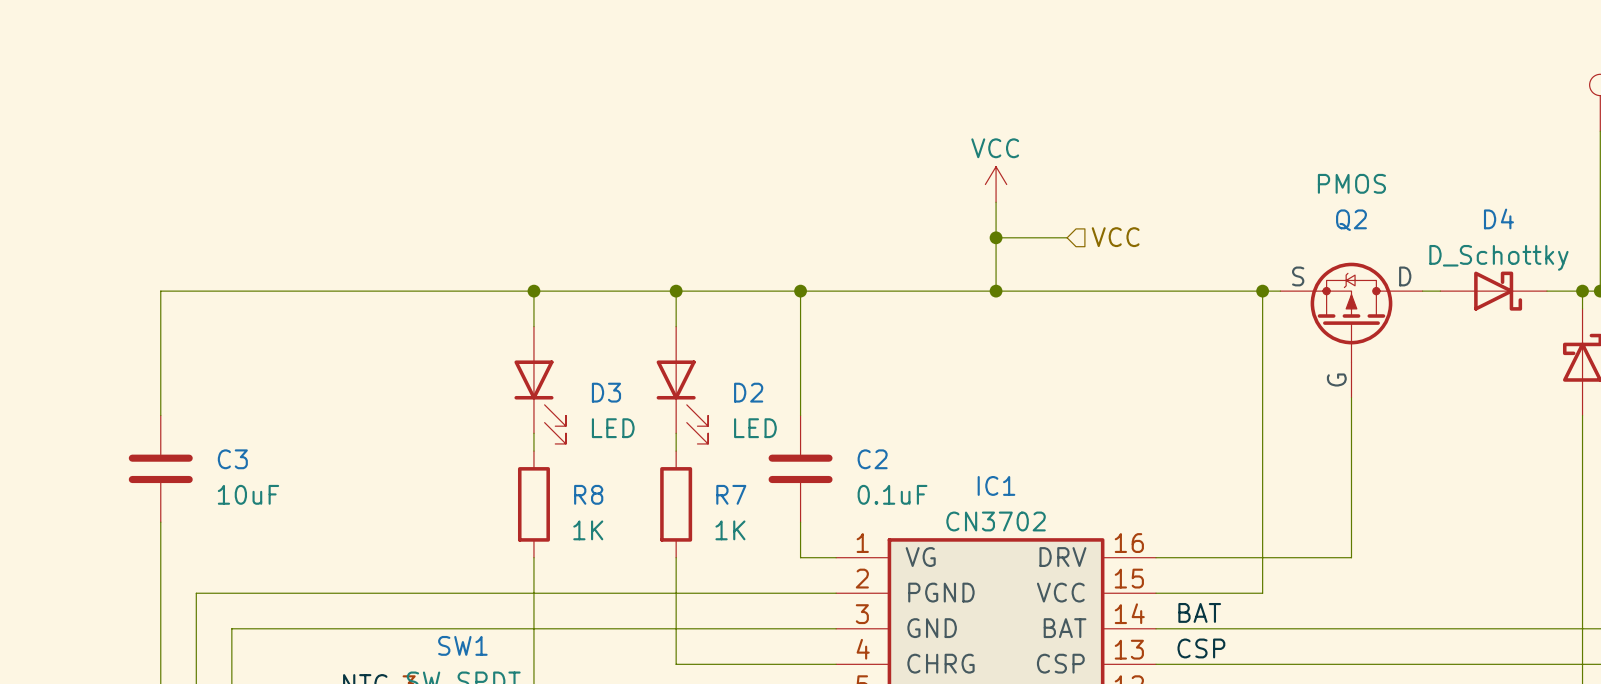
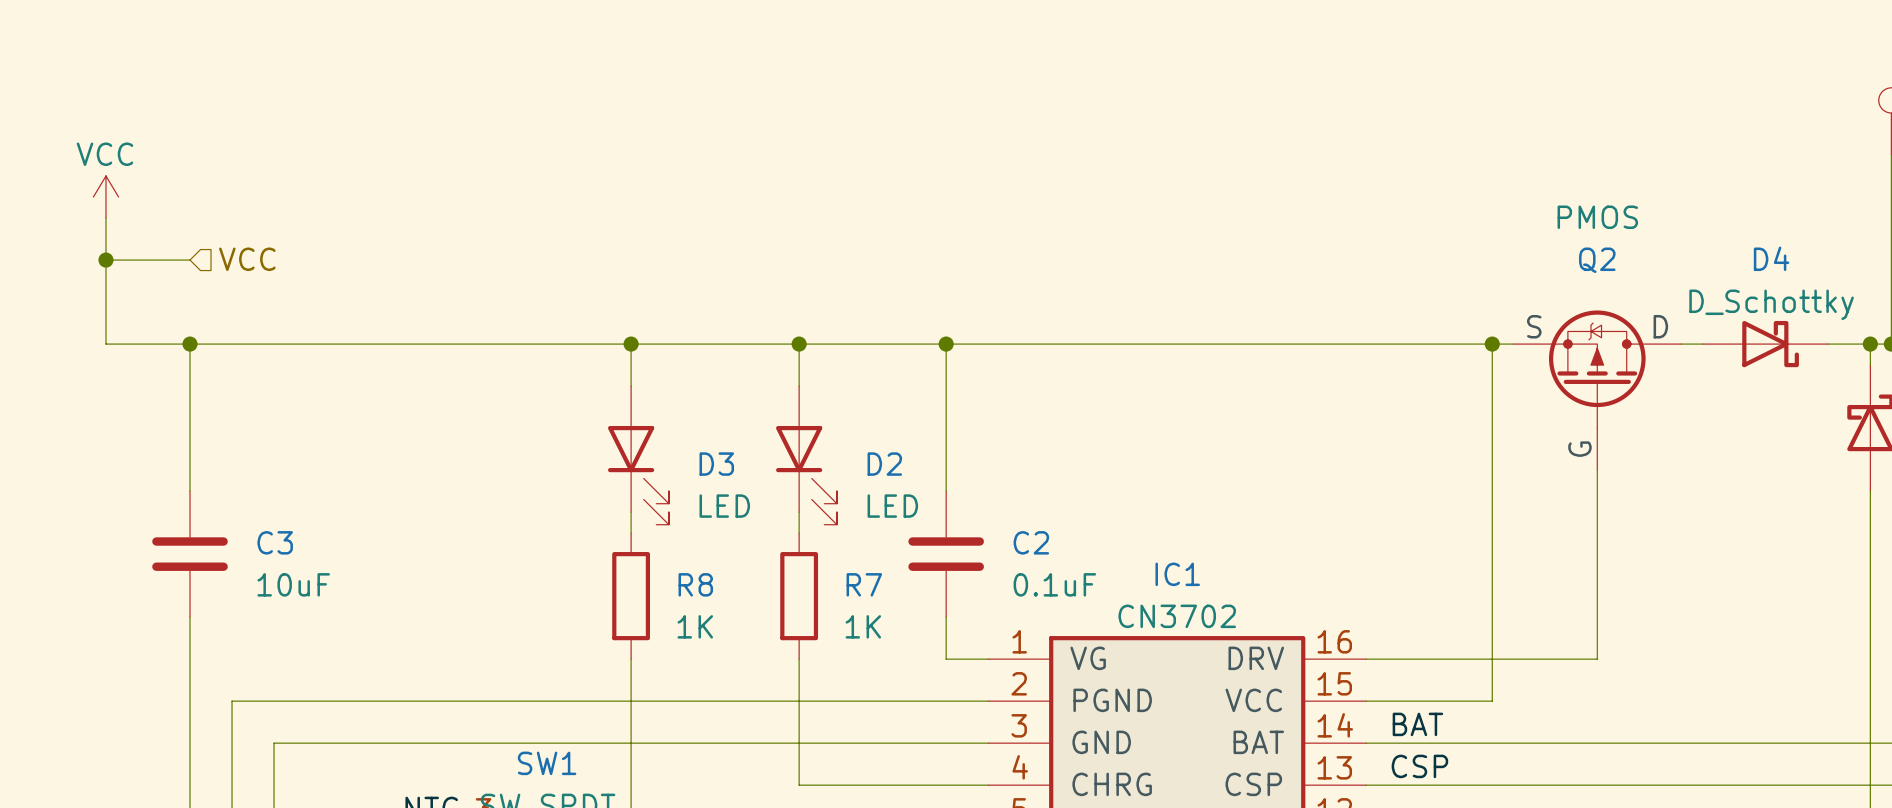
power symbol: none -> VCC (105, 197)
wire: none -> (105, 218) (105, 344) (190, 344)
power symbol: VCC (996, 184) -> none
wire: (996, 202) (996, 291) -> none
hierarchical label: none -> VCC (247, 259)
wire: none -> (105, 260) (190, 260)
junction: none -> (105, 260)
wire: (996, 237) (1067, 237) -> none
junction: (996, 237) -> none
hierarchical label: VCC (1115, 237) -> none
junction: none -> (190, 344)
junction: (996, 291) -> none

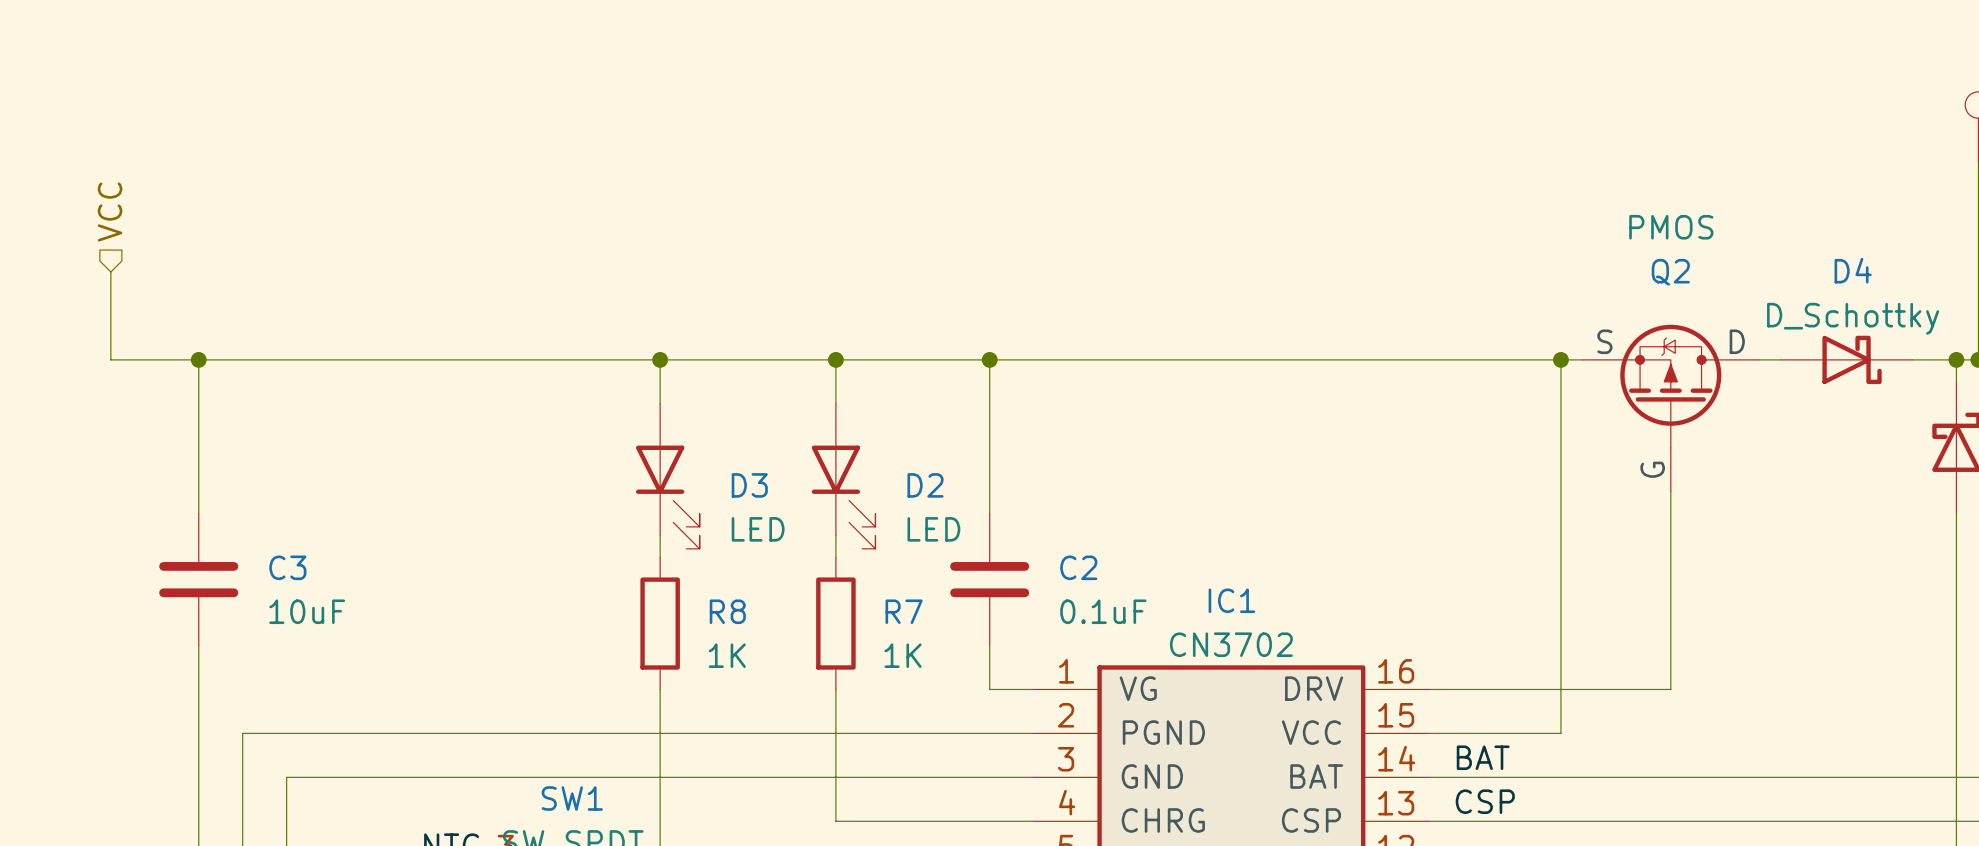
power symbol: VCC (105, 197) -> none
wire: (105, 218) (105, 260) (190, 260) -> none
hierarchical label rotation: 0° (247, 259) -> 90° counterclockwise (110, 212)
hierarchical label position: VCC (247, 259) -> VCC (110, 212)
junction: (105, 260) -> none

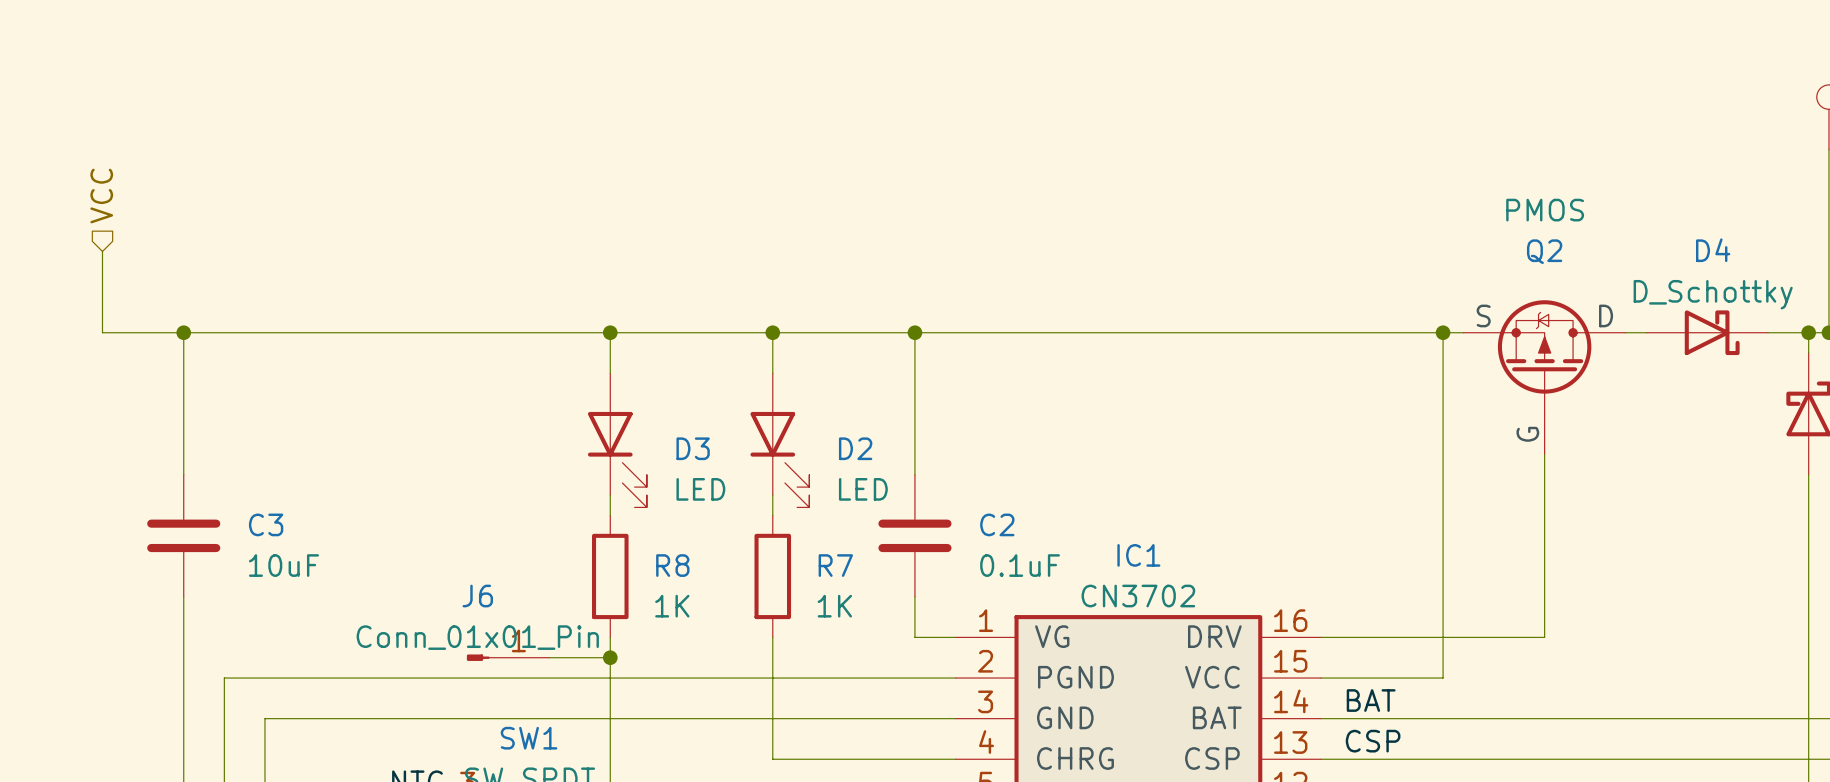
J6: none -> Conn_01x01_Pin (508, 657)
wire: none -> (549, 657) (610, 657)
junction: none -> (610, 657)

